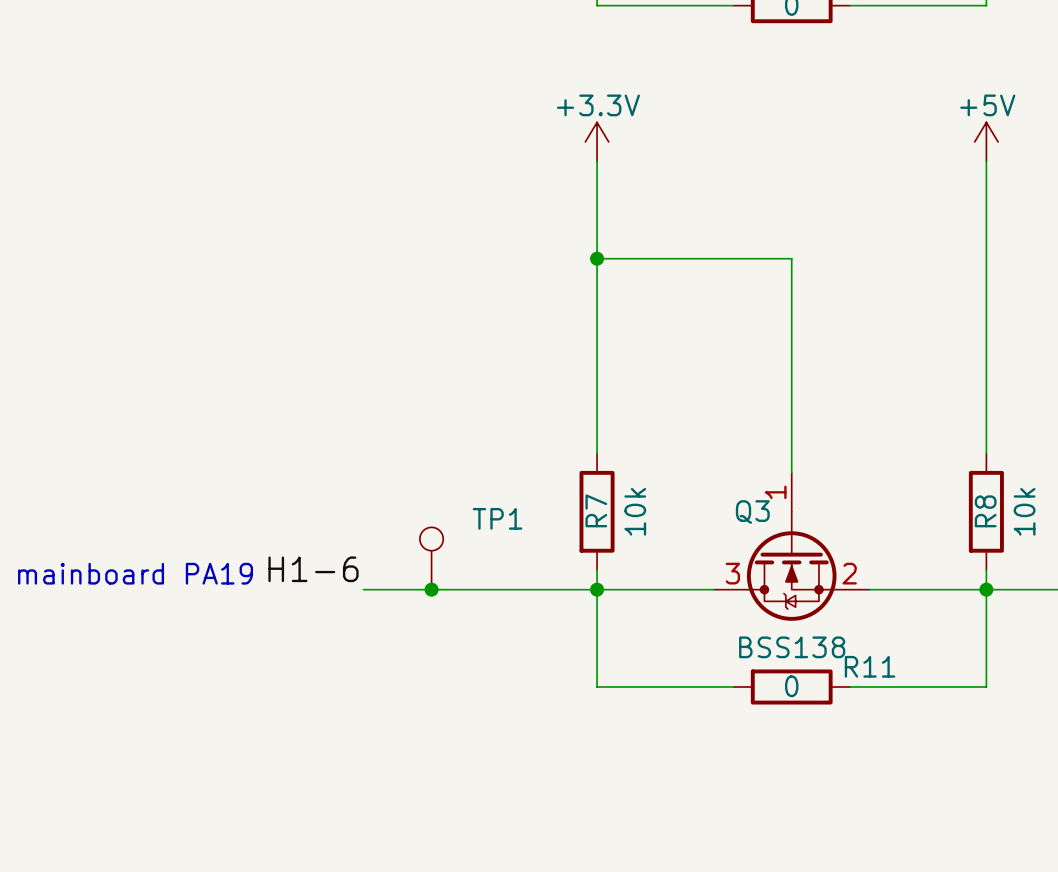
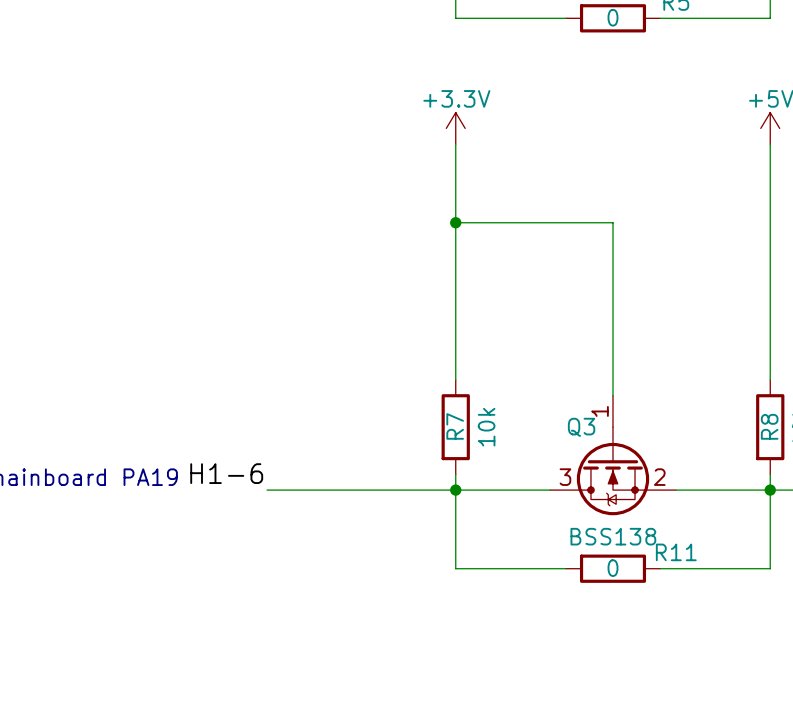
TP1: (431, 558) -> none
junction: (431, 589) -> none

